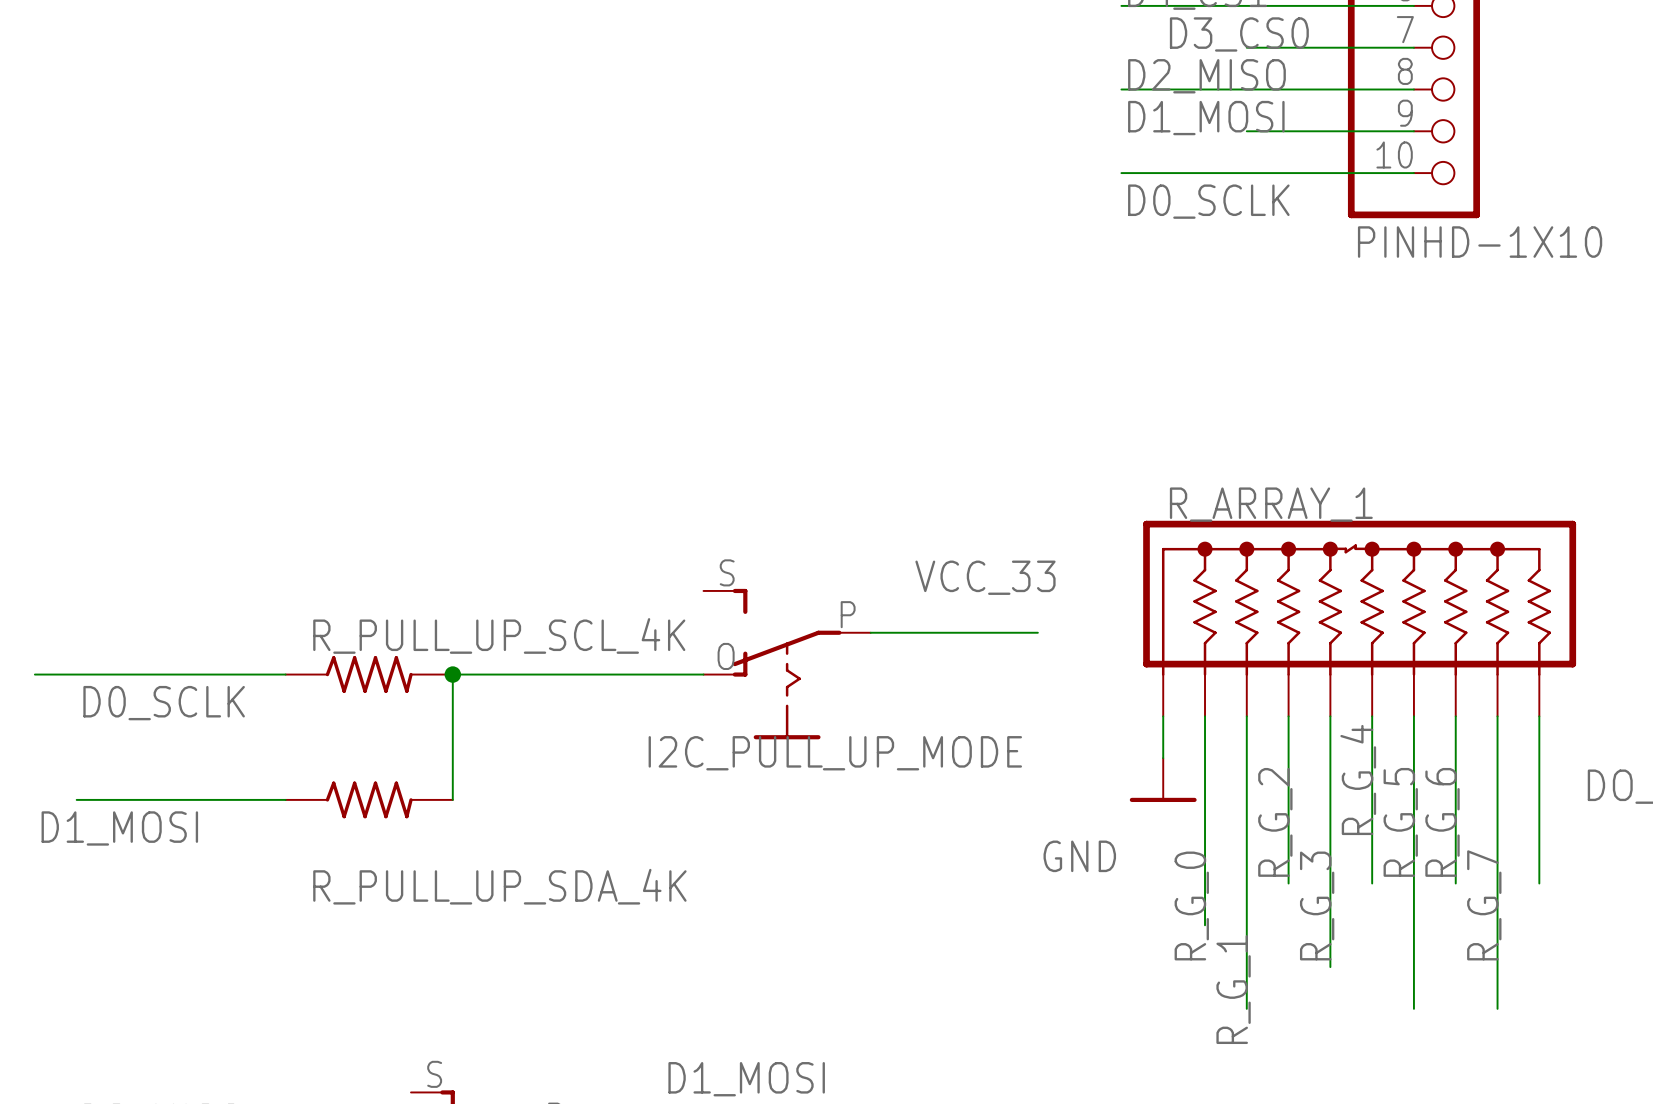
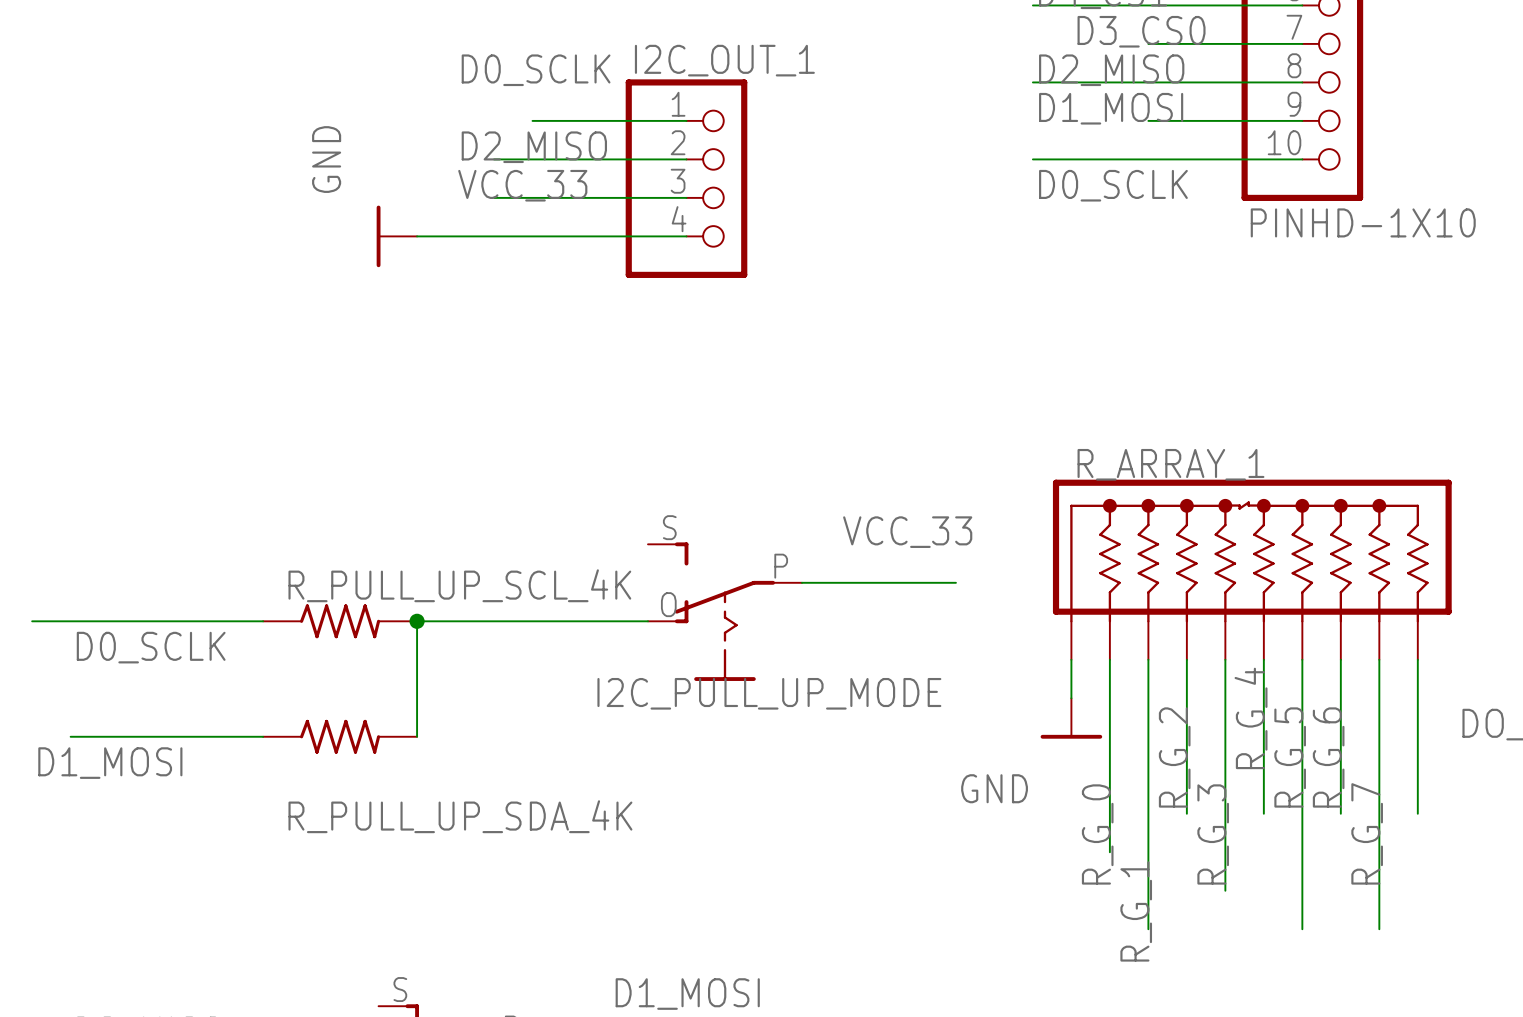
label: none -> D0_SCLK (536, 70)
wire: none -> (532, 120) (686, 120)
label: none -> D2_MISO (534, 147)
wire: none -> (494, 159) (686, 159)
I2C_OUT_1: none -> (686, 178)
label: none -> VCC_33 (522, 185)
wire: none -> (494, 197) (686, 197)
power symbol: none -> GND (396, 236)
wire: none -> (417, 236) (686, 236)

